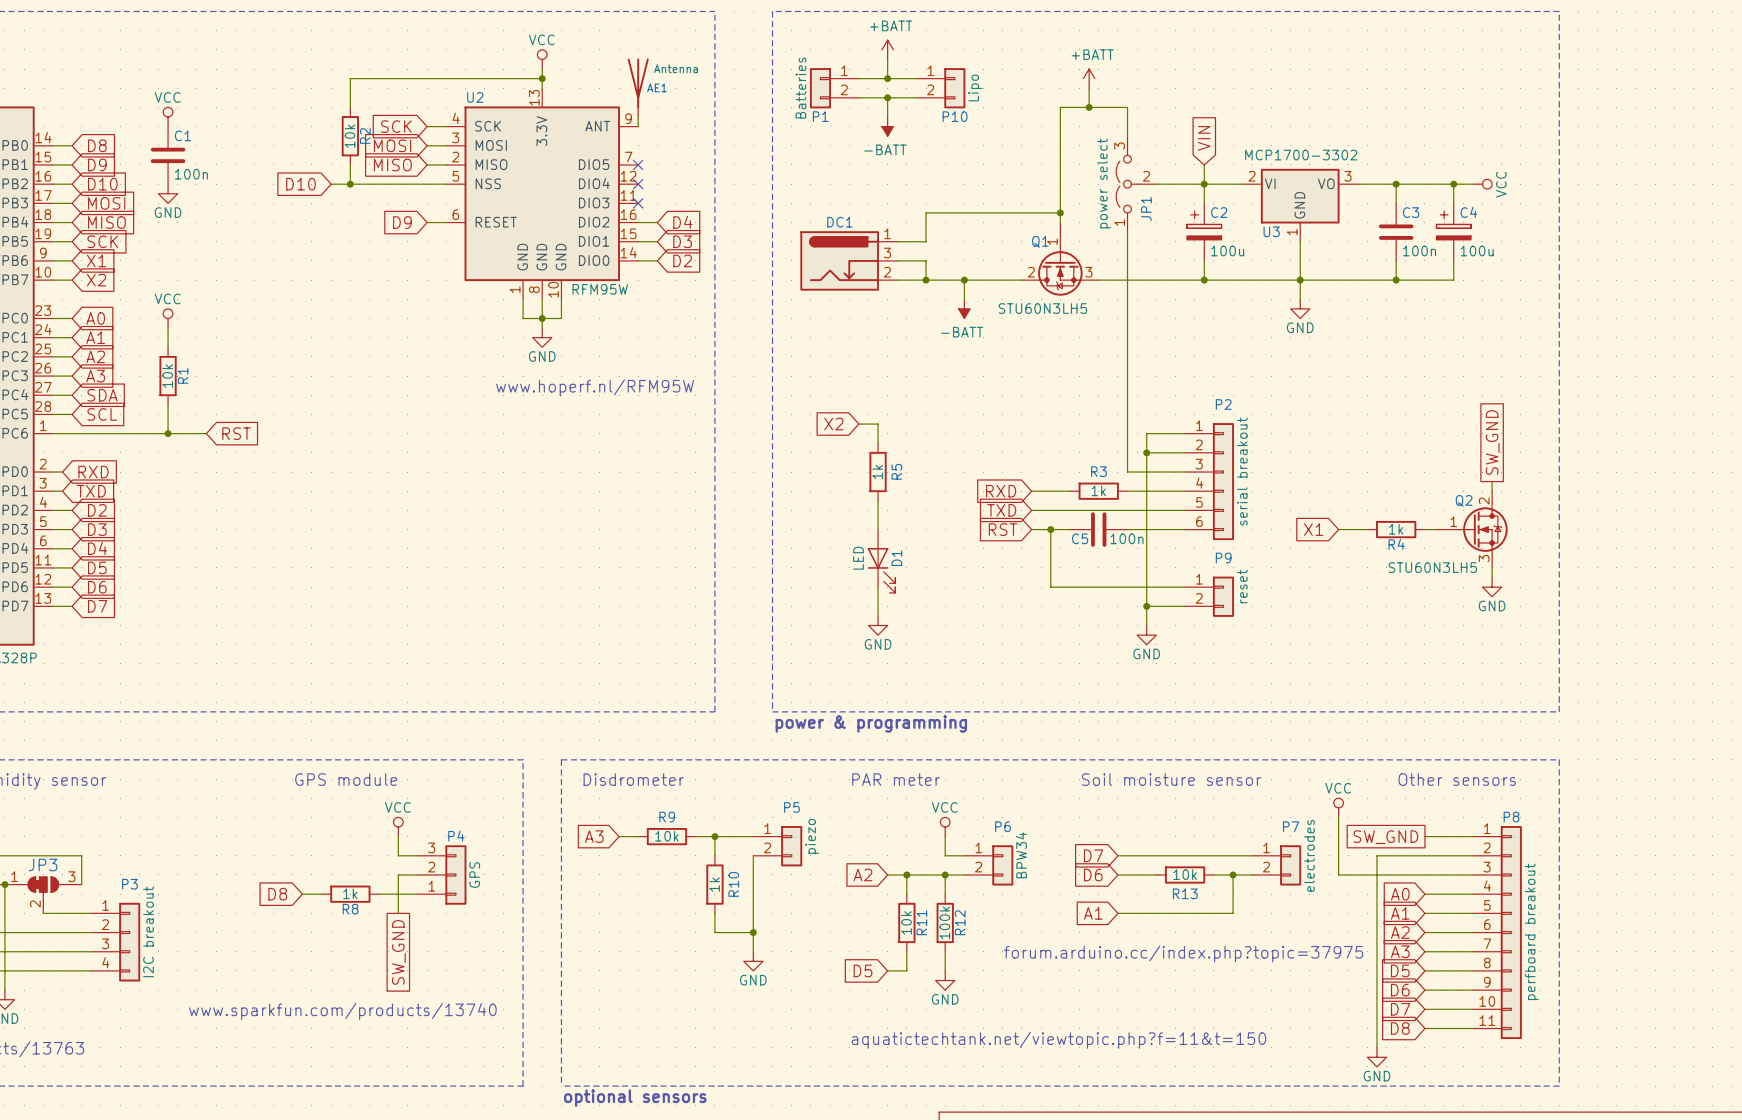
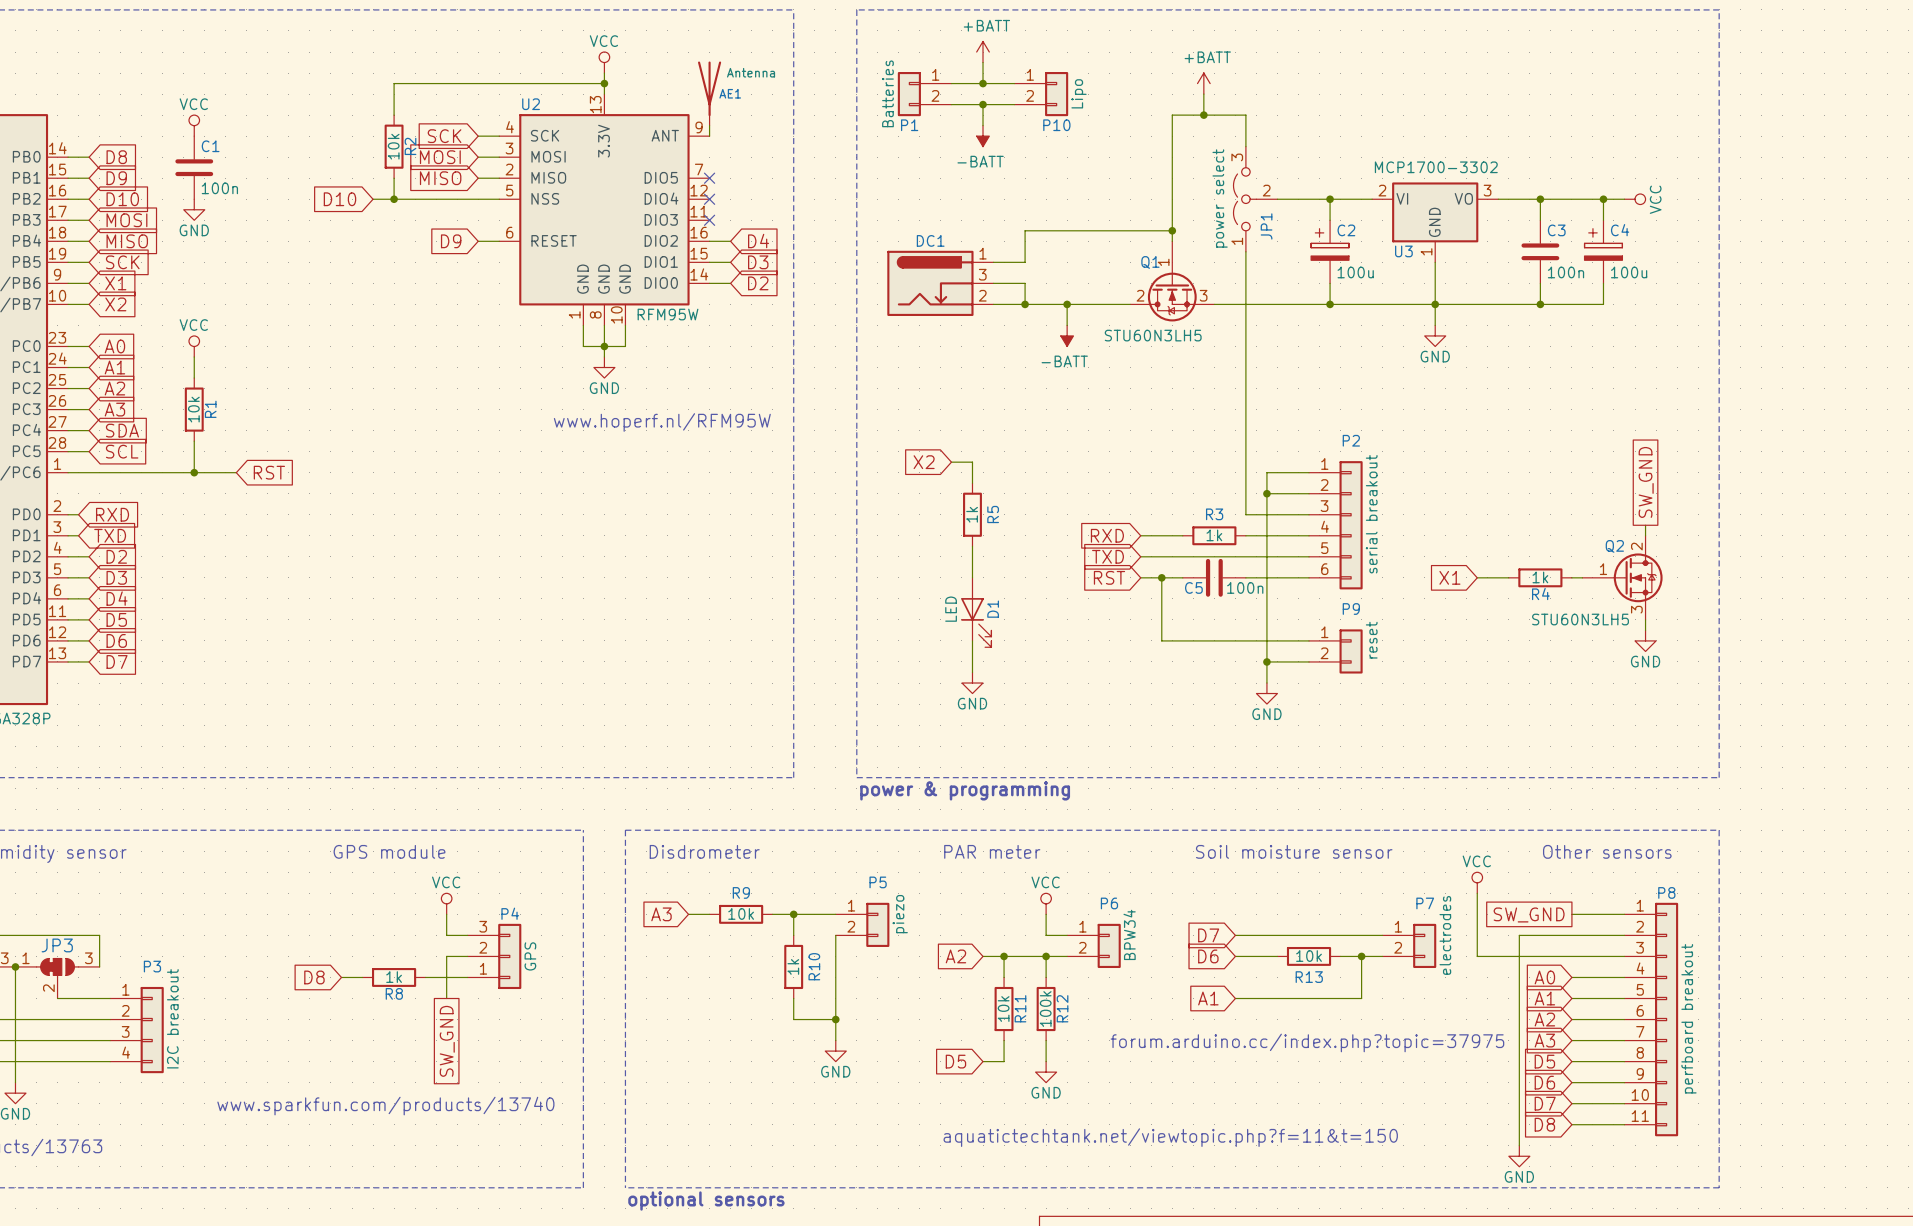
global label: VIN (1204, 138) -> none
wire: (1204, 164) (1204, 184) -> none

